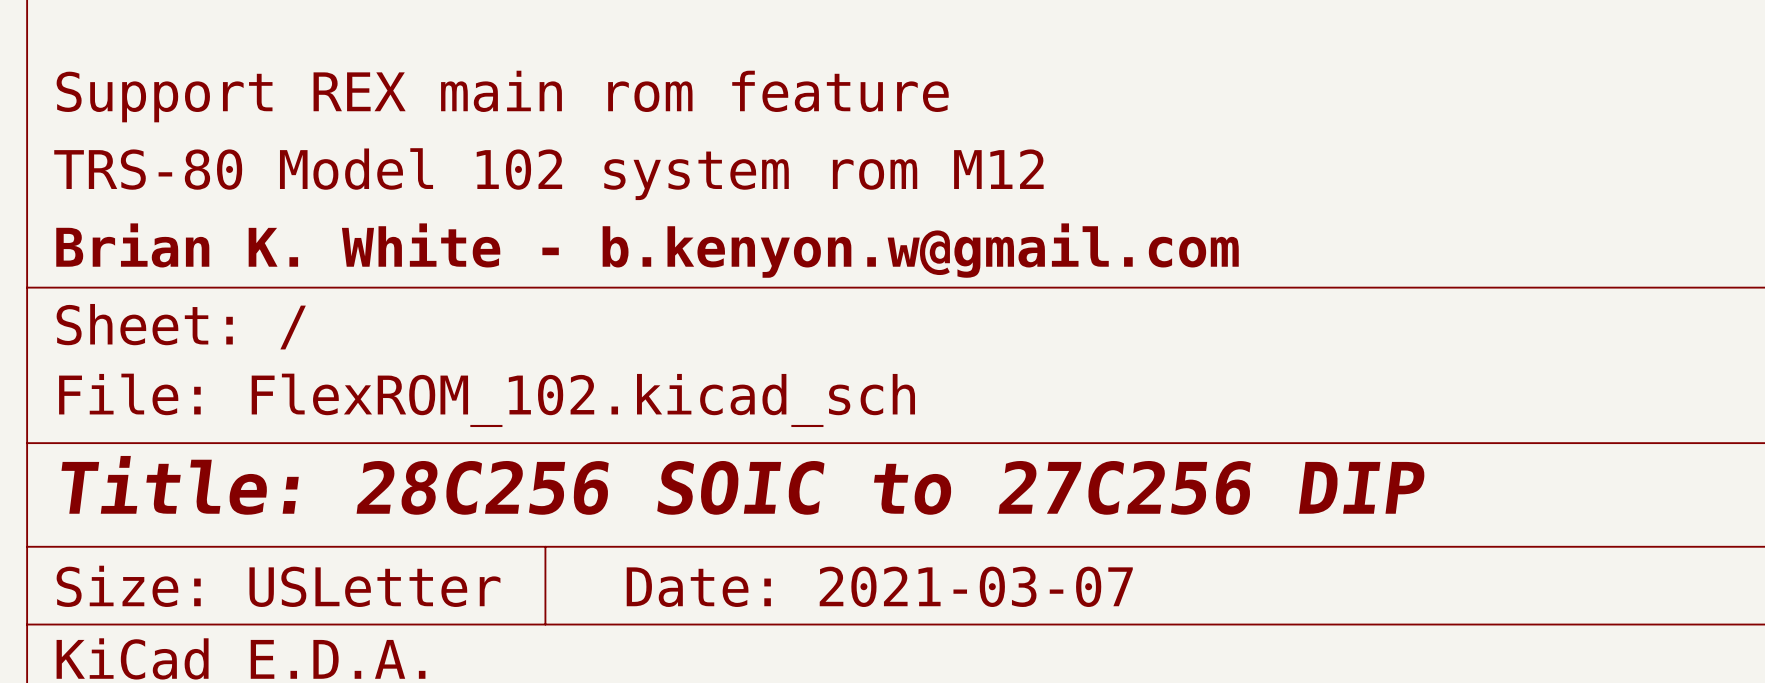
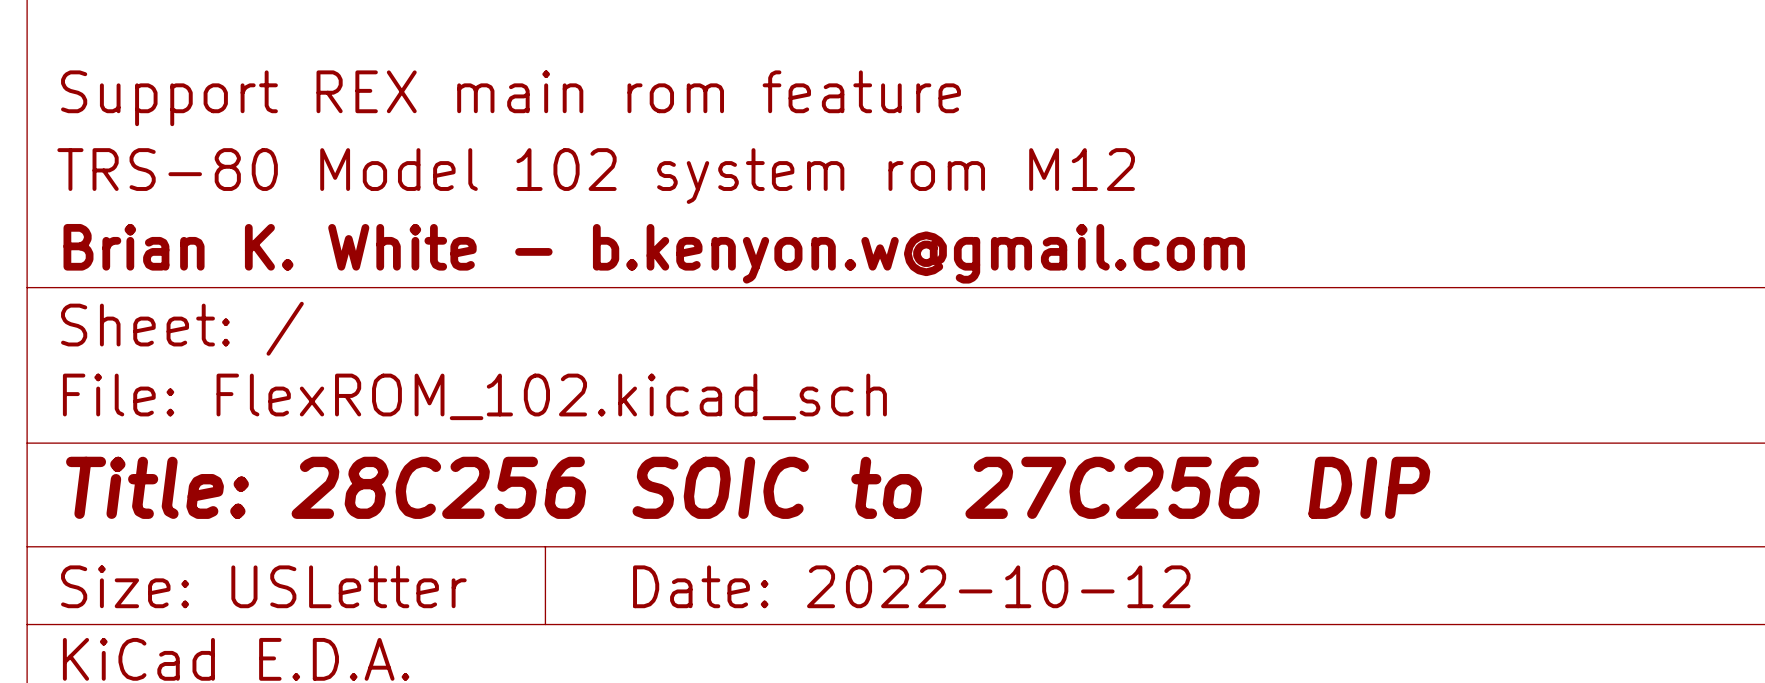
title block: Date: 2021-03-07 (879, 586) -> Date: 2022-10-12 (911, 586)

